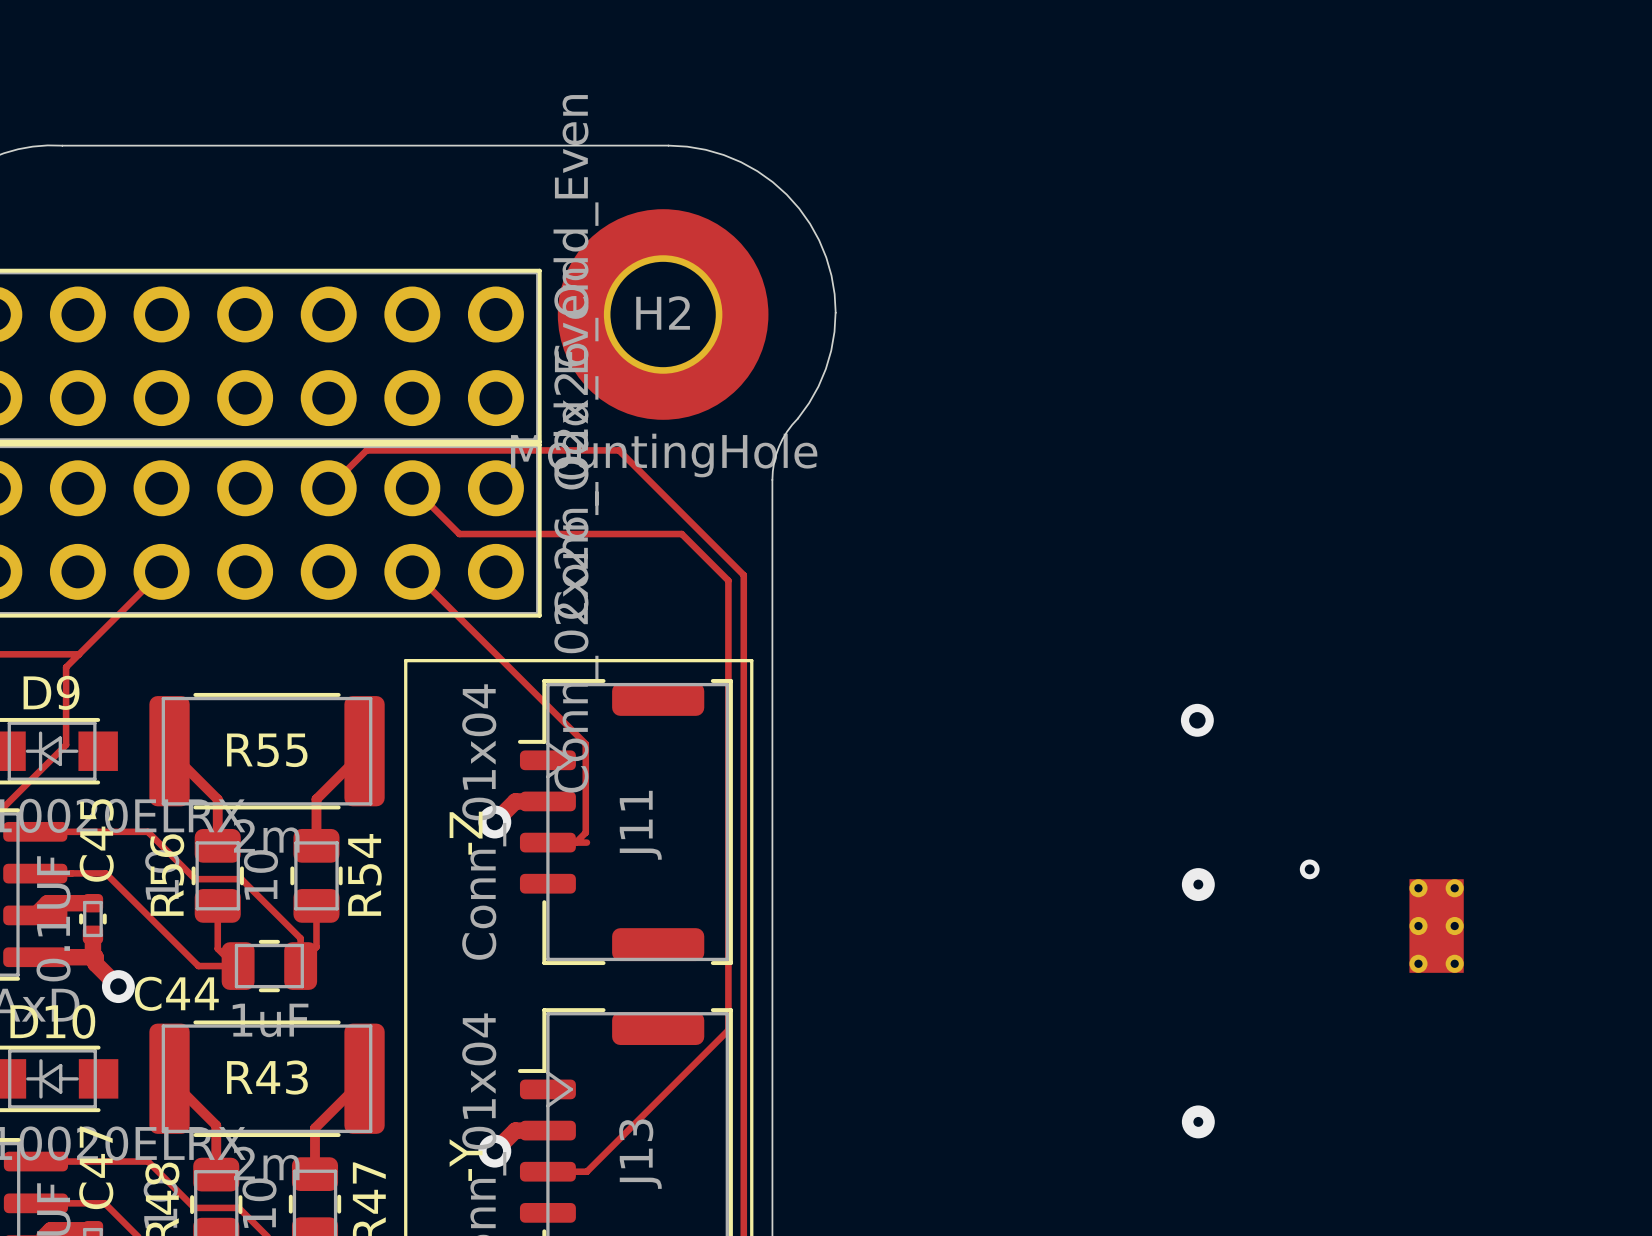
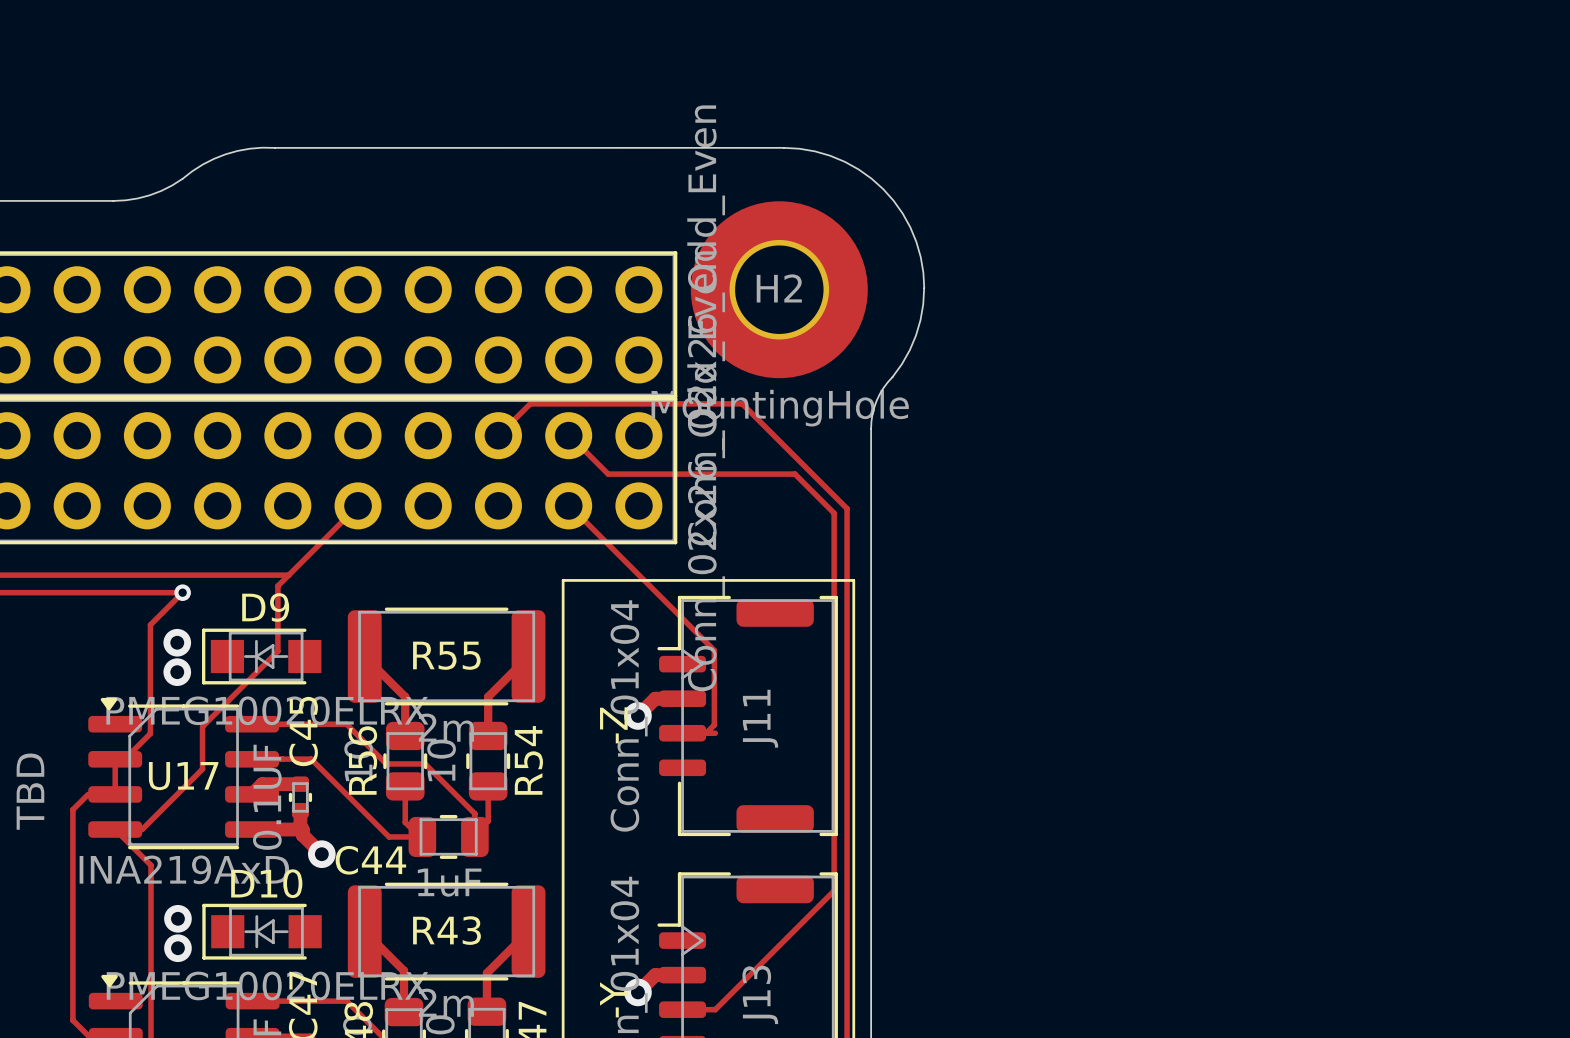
via: (1197, 720) -> none
via: (1309, 869) -> none
via: (1198, 884) -> none
part: (1436, 926) -> none
via: (1198, 1121) -> none

